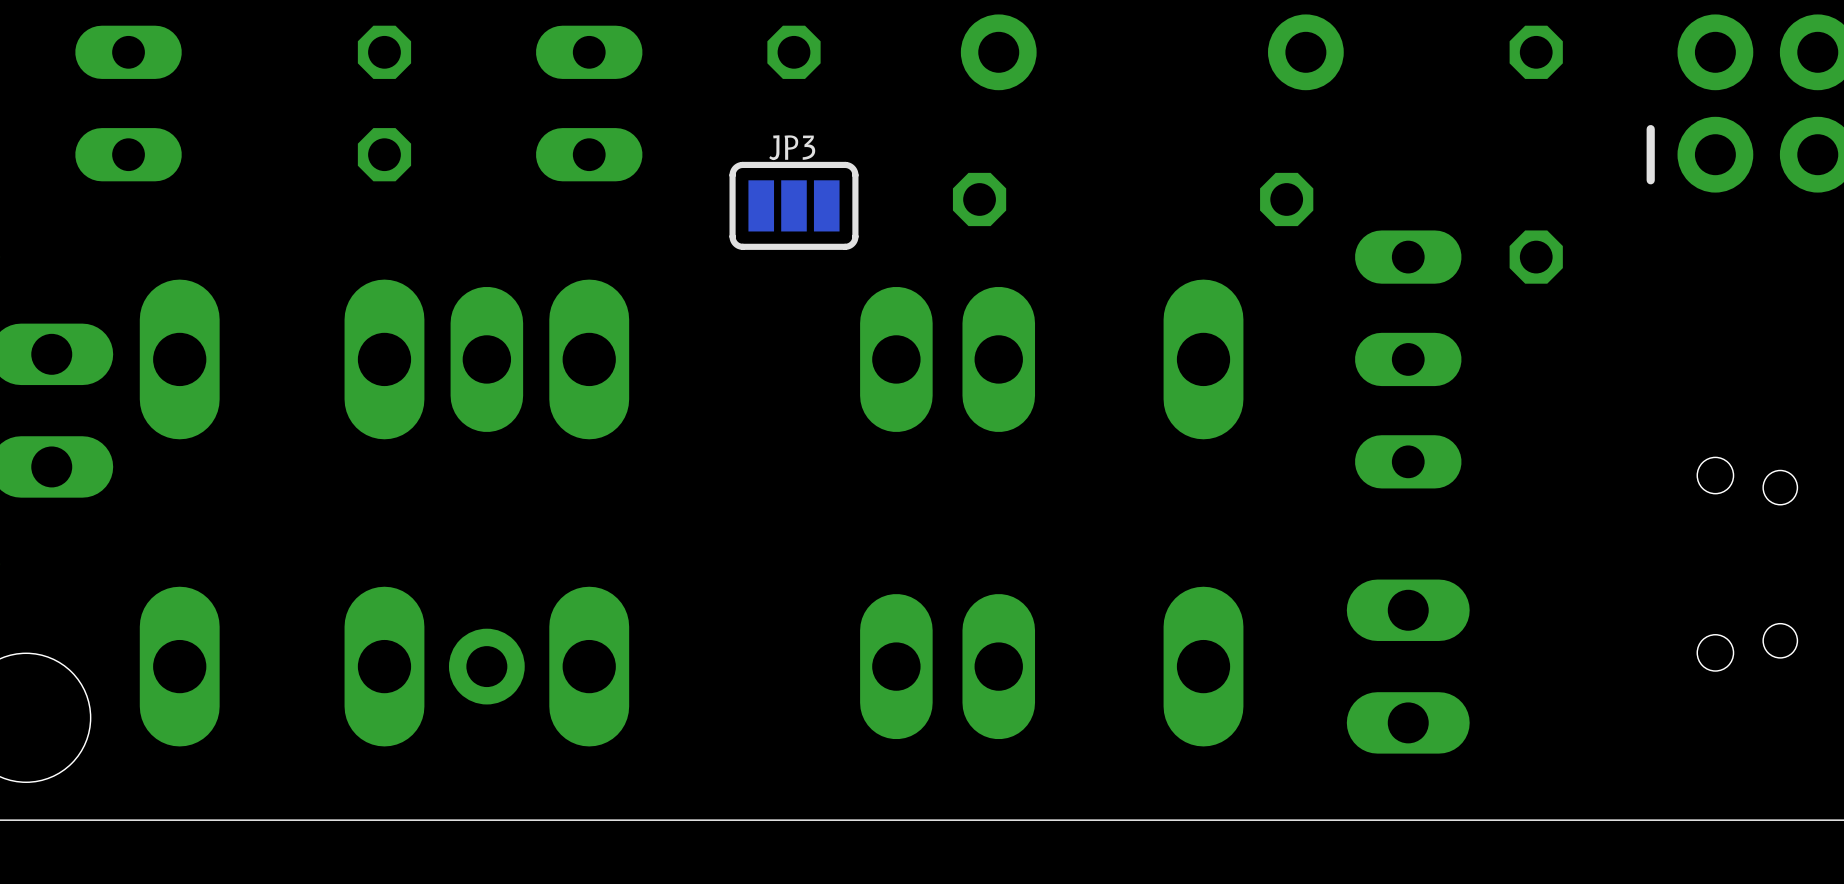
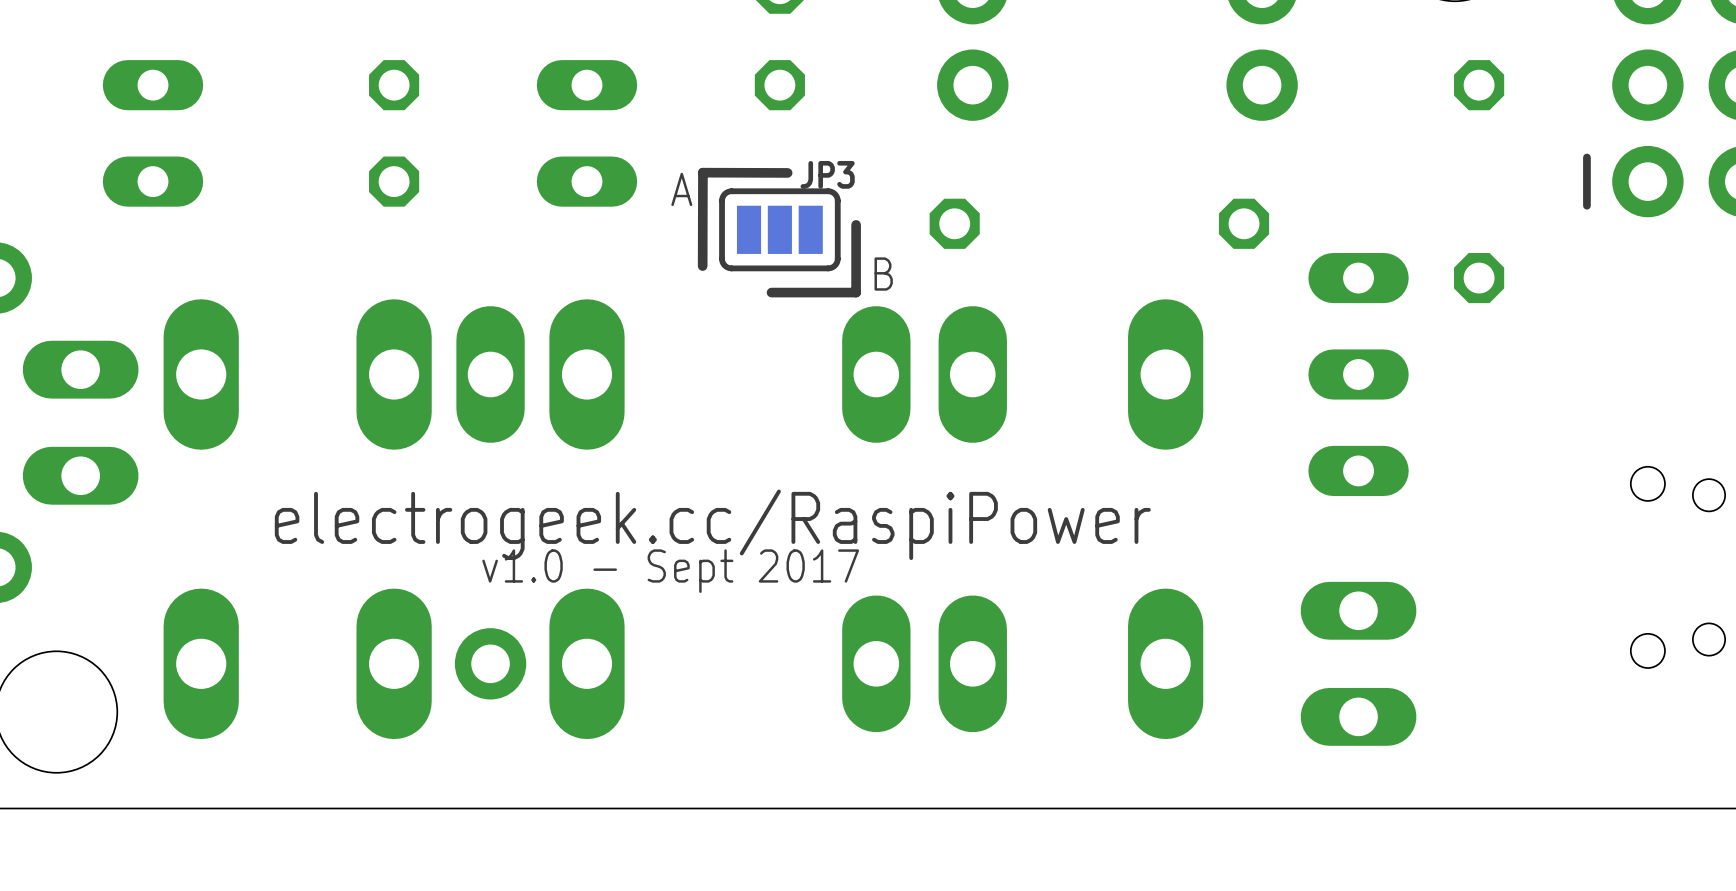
line: none -> (787, 172) (702, 172) (702, 266)
JP3 name position: JP3 (792, 147) -> JP3 (827, 174)
text: none -> A (681, 189)
line: none -> (856, 224) (856, 292) (771, 292)
text: none -> B (883, 274)
text: none -> electrogeek.cc/RaspiPower (712, 524)
text: none -> v1.0 - Sept 2017 (670, 571)

